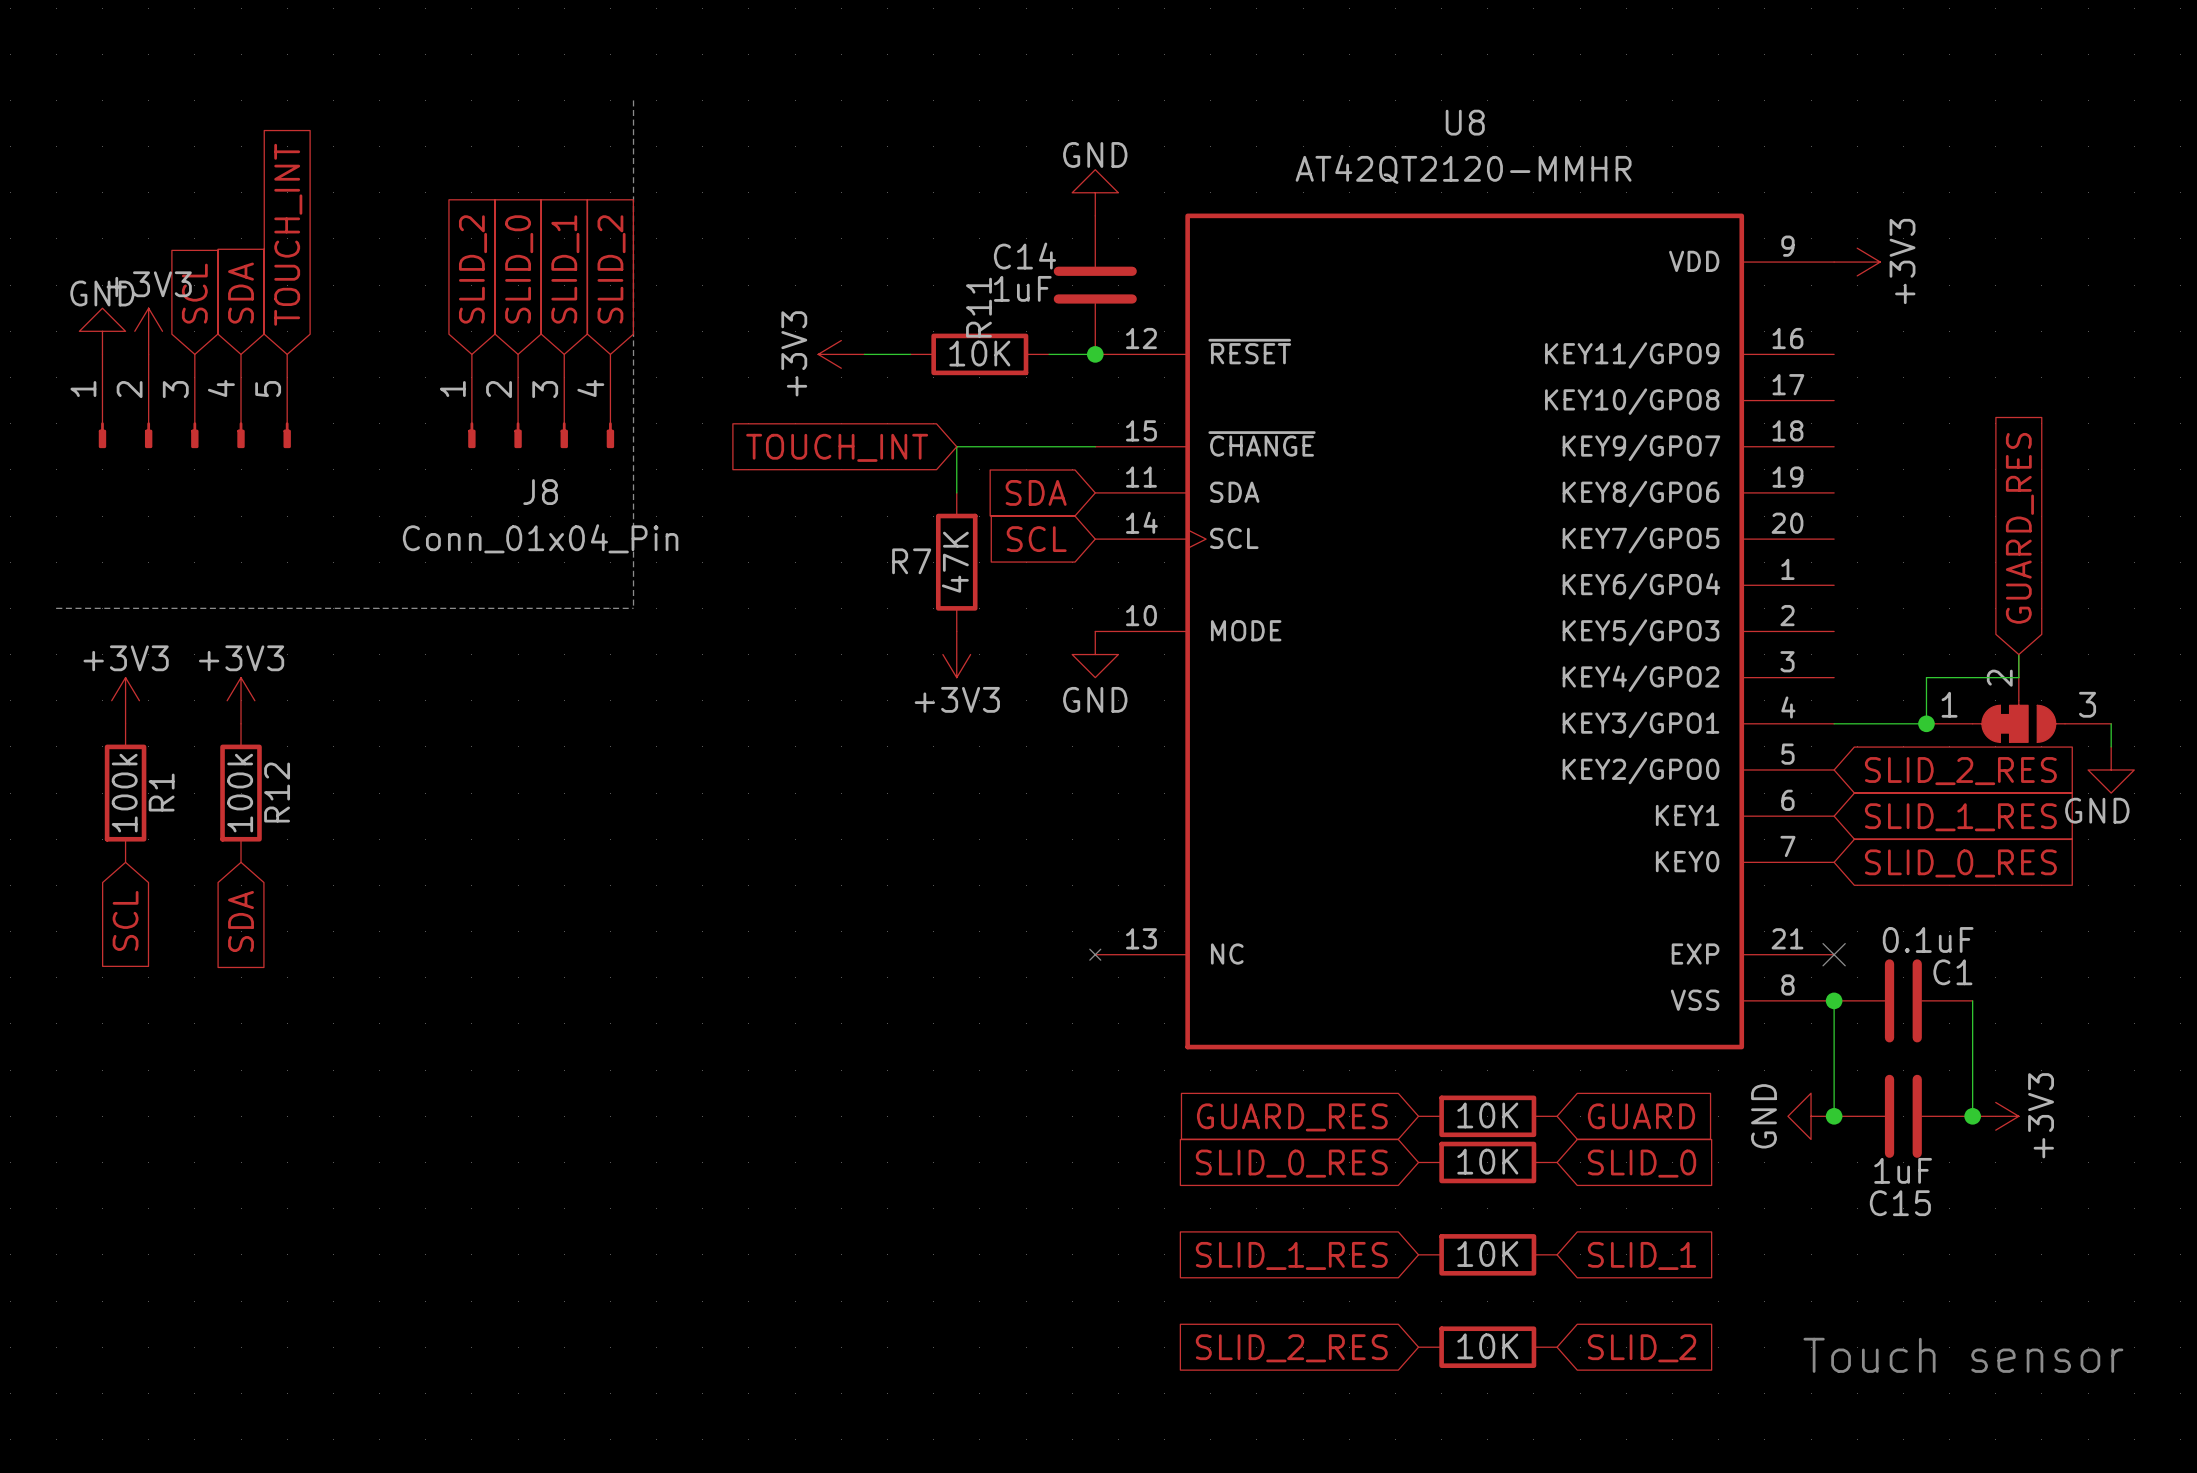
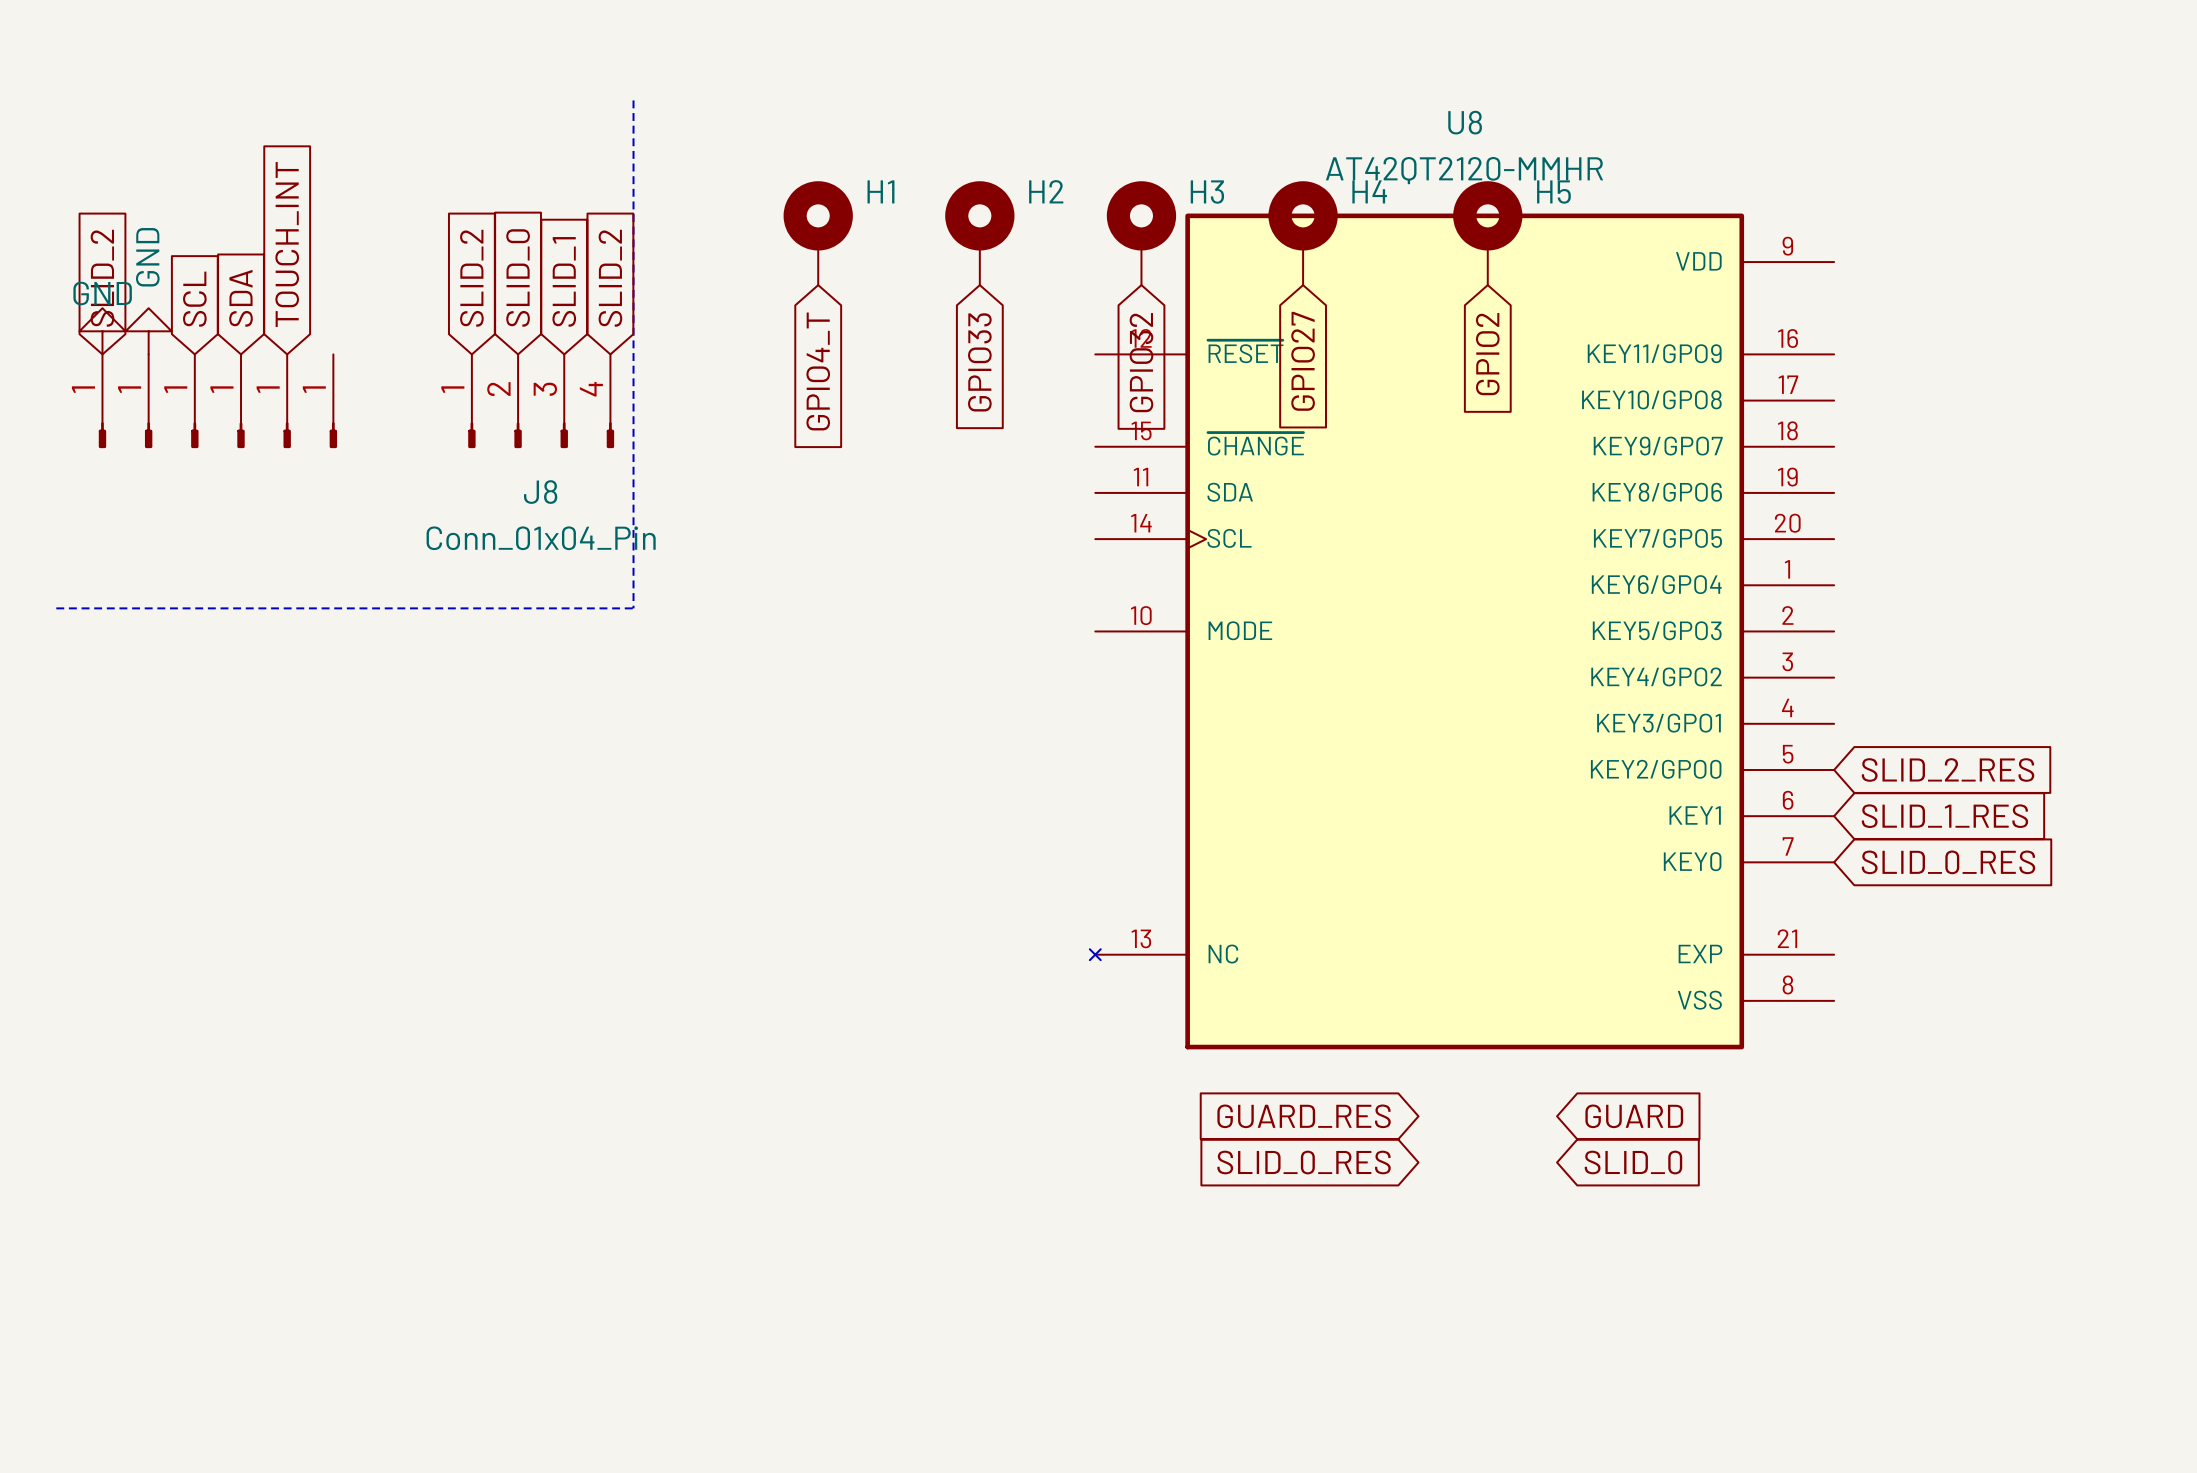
power symbol: GND (1095, 192) -> none
H1: none -> (818, 233)
H2: none -> (979, 233)
H3: none -> (1141, 233)
H4: none -> (1303, 233)
H5: none -> (1487, 233)
power symbol: +3V3 (1857, 262) -> none
global label: none -> SLID_2 (102, 278)
C14: 1uF (1095, 285) -> none
power symbol: +3V3 (148, 331) -> GND (148, 331)
part symbol: [98, 354, 291, 449] -> [191, 354, 199, 449]
power symbol: +3V3 (841, 354) -> none
wire: (864, 354) (910, 354) -> none
R11: 10K (979, 354) -> none
wire: (1049, 354) (1095, 354) -> none
junction: (1095, 354) -> none
global label: none -> GPIO2 (1487, 354)
global label: none -> GPIO33 (979, 362)
global label: none -> GPIO32 (1141, 362)
global label: none -> GPIO27 (1303, 361)
global label: none -> GPIO4_T (818, 371)
part: none -> (102, 401)
part: none -> (148, 401)
part: none -> (241, 401)
part: none -> (287, 401)
part: none -> (333, 401)
wire: (1095, 446) (956, 446) (956, 492) -> none
global label: TOUCH_INT (837, 447) -> none
global label: SDA (1036, 492) -> none
global label: GUARD_RES (2019, 528) -> none
global label: SCL (1036, 539) -> none
R7: 47K (956, 562) -> none
power symbol: +3V3 (956, 654) -> none
power symbol: GND (1095, 654) -> none
wire: (2018, 654) (2018, 677) (1926, 677) (1926, 723) (1834, 723) -> none
part: (2018, 698) -> none
power symbol: +3V3 (125, 700) -> none
power symbol: +3V3 (241, 700) -> none
junction: (1926, 723) -> none
wire: (2111, 723) (2111, 746) -> none
power symbol: GND (2111, 769) -> none
R1: 100k (125, 793) -> none
R12: 100k (241, 793) -> none
global label: SCL (125, 920) -> none
global label: SDA (241, 921) -> none
no-connect mark: (1834, 954) -> none
wire: (1834, 1000) (1834, 1116) -> none
junction: (1834, 1000) -> none
C1: 0.1uF (1903, 1000) -> none
wire: (1972, 1000) (1972, 1116) -> none
part: 10K (1487, 1116) -> none
power symbol: GND (1811, 1116) -> none
junction: (1834, 1116) -> none
C15: 1uF (1903, 1116) -> none
junction: (1972, 1116) -> none
power symbol: +3V3 (1995, 1116) -> none
part: 10K (1487, 1162) -> none
part: 10K (1487, 1254) -> none
global label: SLID_1_RES (1291, 1255) -> none
global label: SLID_1 (1642, 1255) -> none
part: 10K (1487, 1347) -> none
global label: SLID_2_RES (1291, 1348) -> none
global label: SLID_2 (1642, 1348) -> none
text: Touch sensor (1963, 1355) -> none

